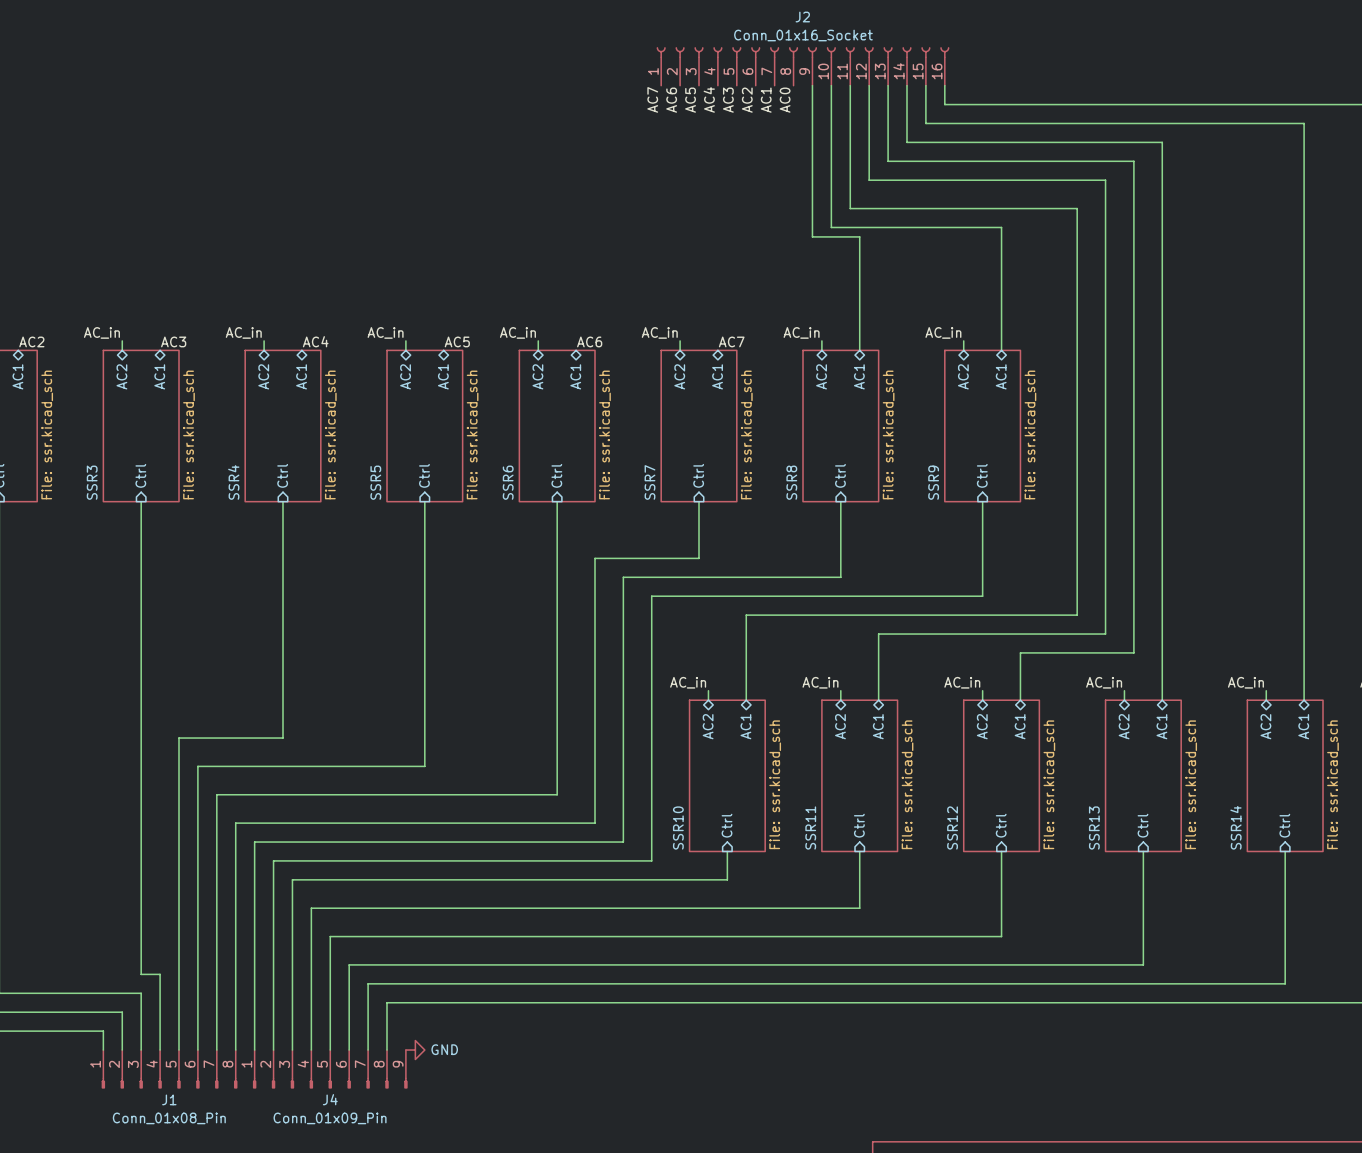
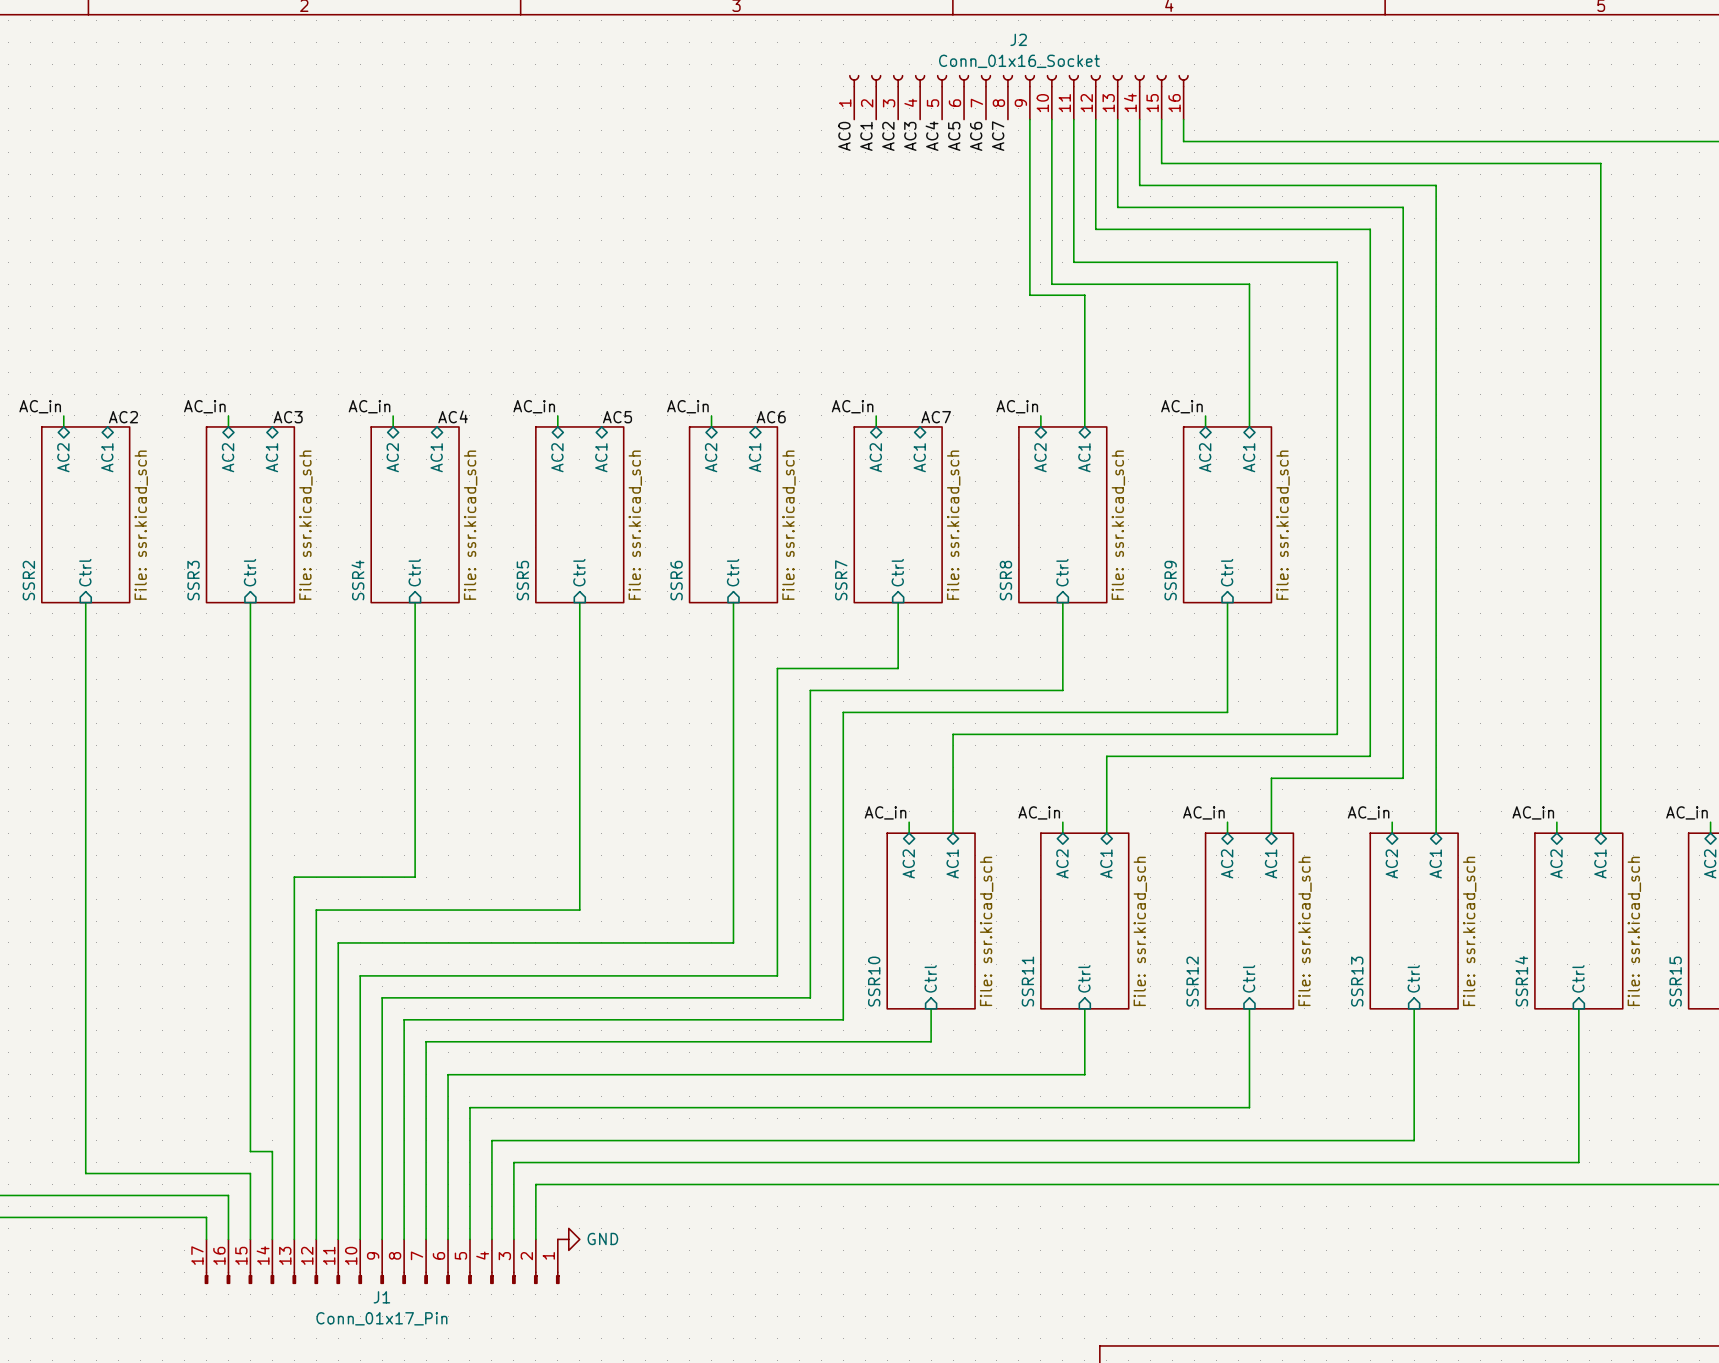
label: AC7 (652, 99) -> AC0 (844, 136)
label: AC4 (709, 99) -> AC3 (910, 136)
label: AC6 (671, 100) -> AC1 (866, 136)
label: AC5 (690, 100) -> AC2 (888, 136)
label: AC3 (728, 100) -> AC4 (932, 136)
label: AC2 (747, 100) -> AC5 (954, 136)
label: AC1 (766, 100) -> AC6 (976, 136)
label: AC0 (785, 100) -> AC7 (998, 136)
J1 symbol: [101, 1050, 238, 1089] -> [204, 1239, 560, 1284]
J4: Conn_01x09_Pin (330, 1069) -> none
J1 value: Conn_01x08_Pin (169, 1118) -> Conn_01x17_Pin (381, 1318)

